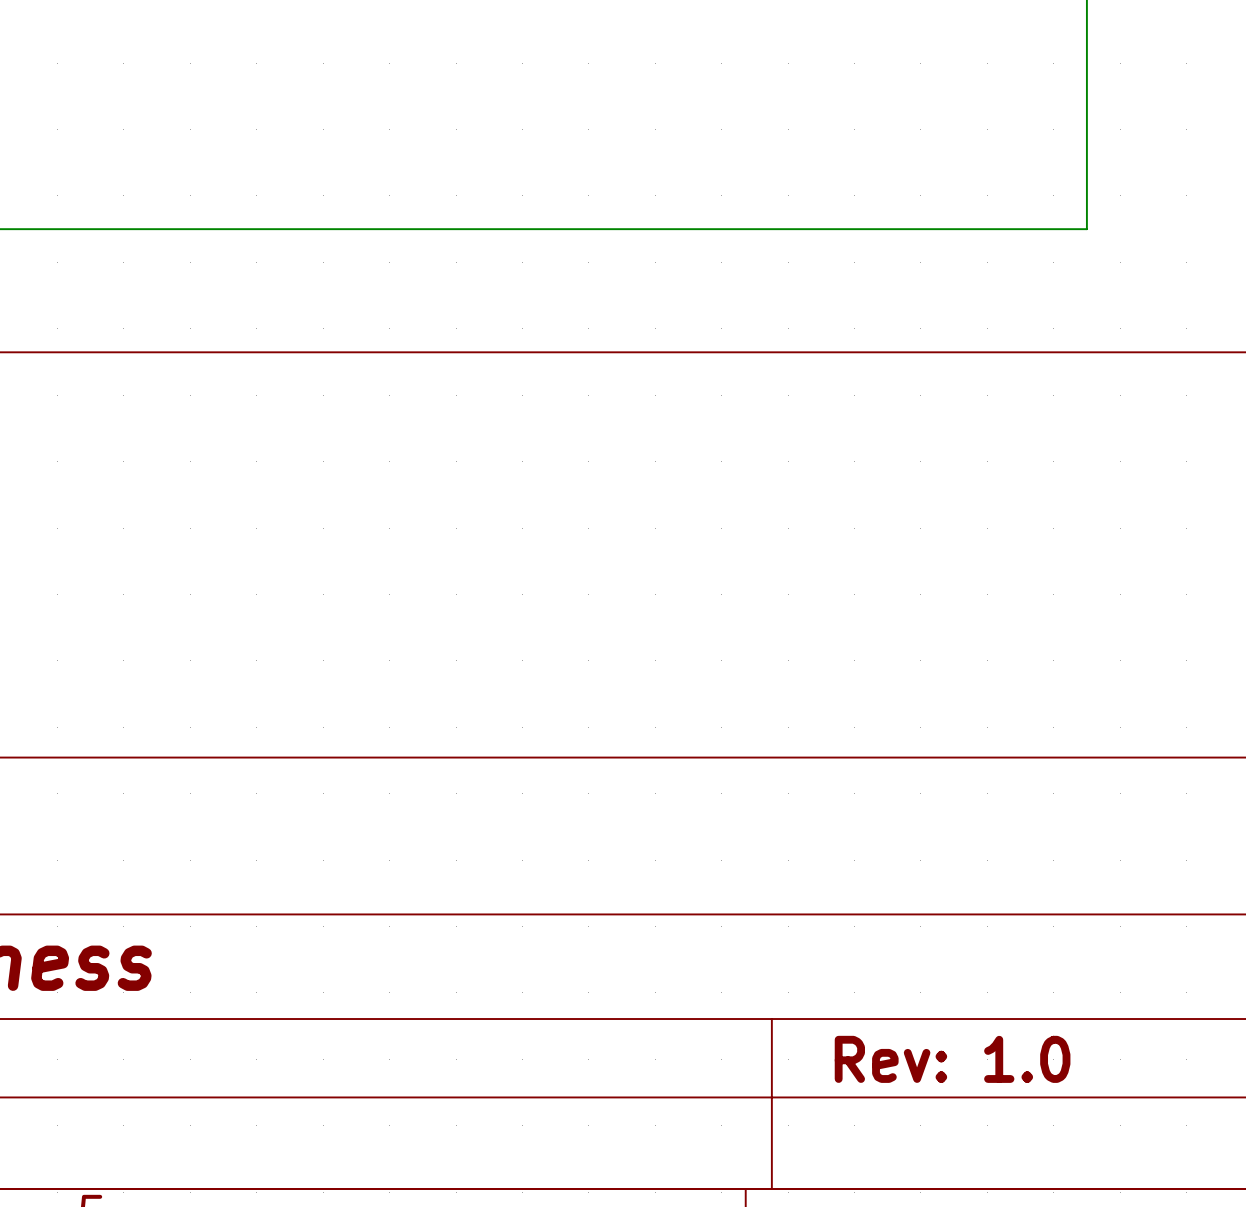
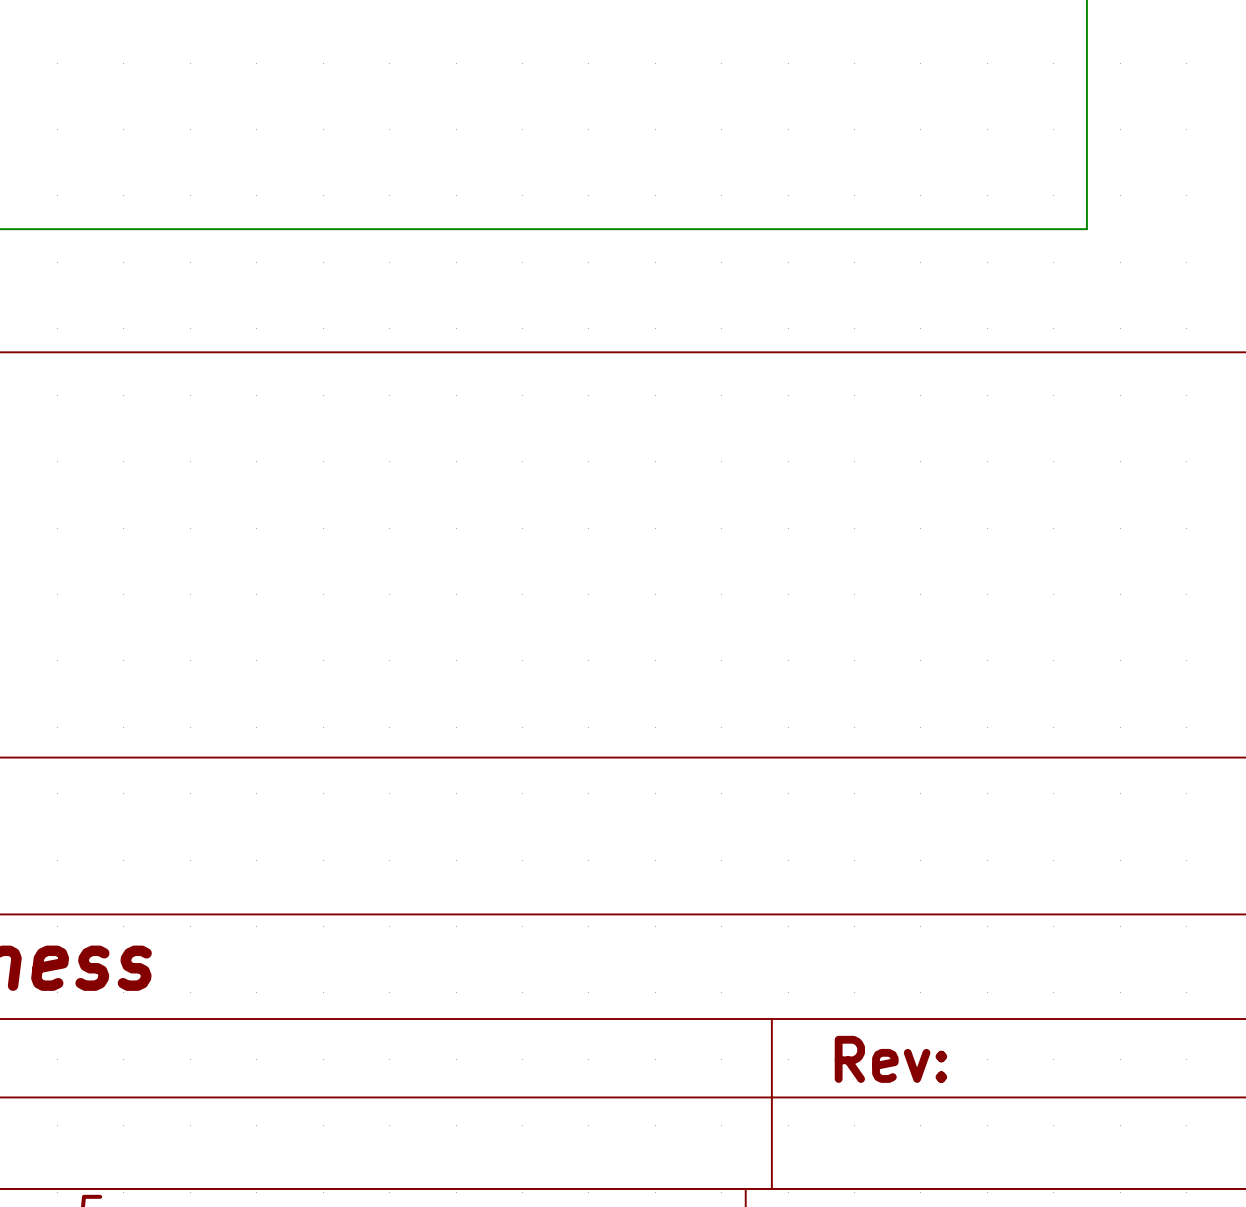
title block: Rev: 1.0 (952, 1059) -> Rev: (890, 1059)

